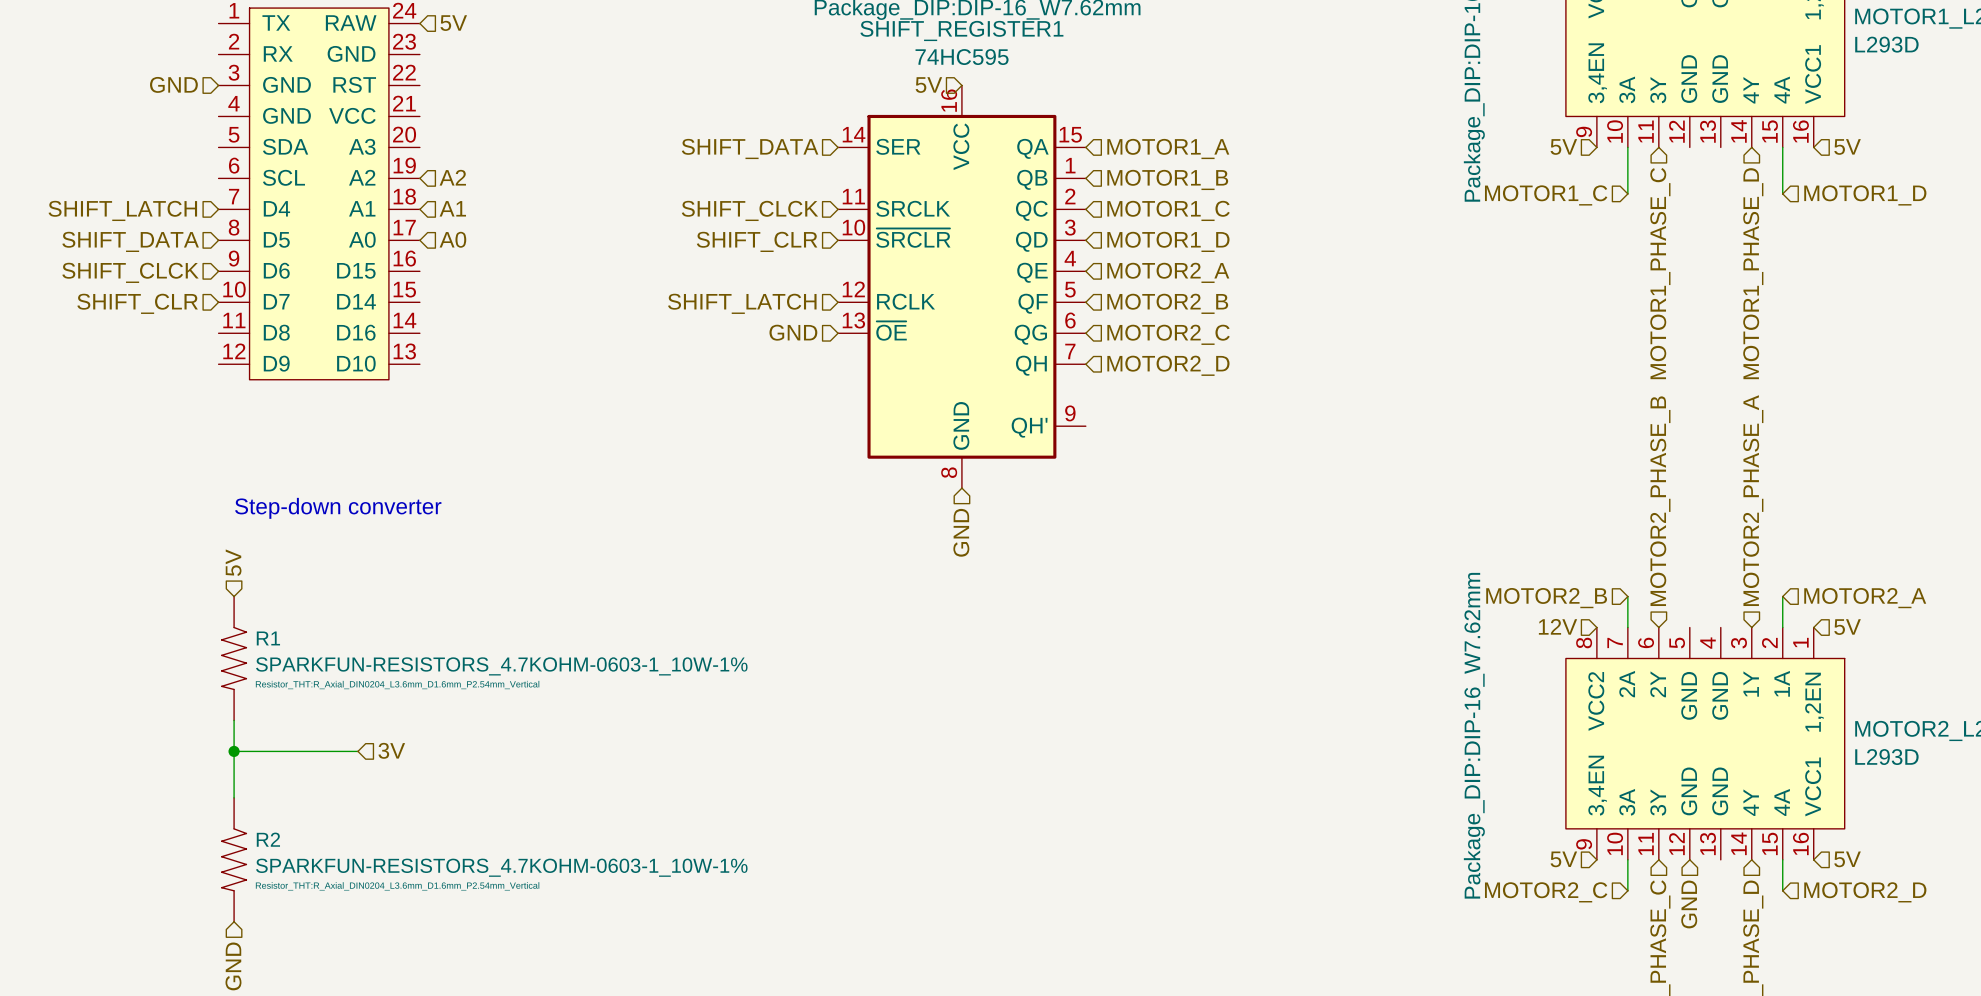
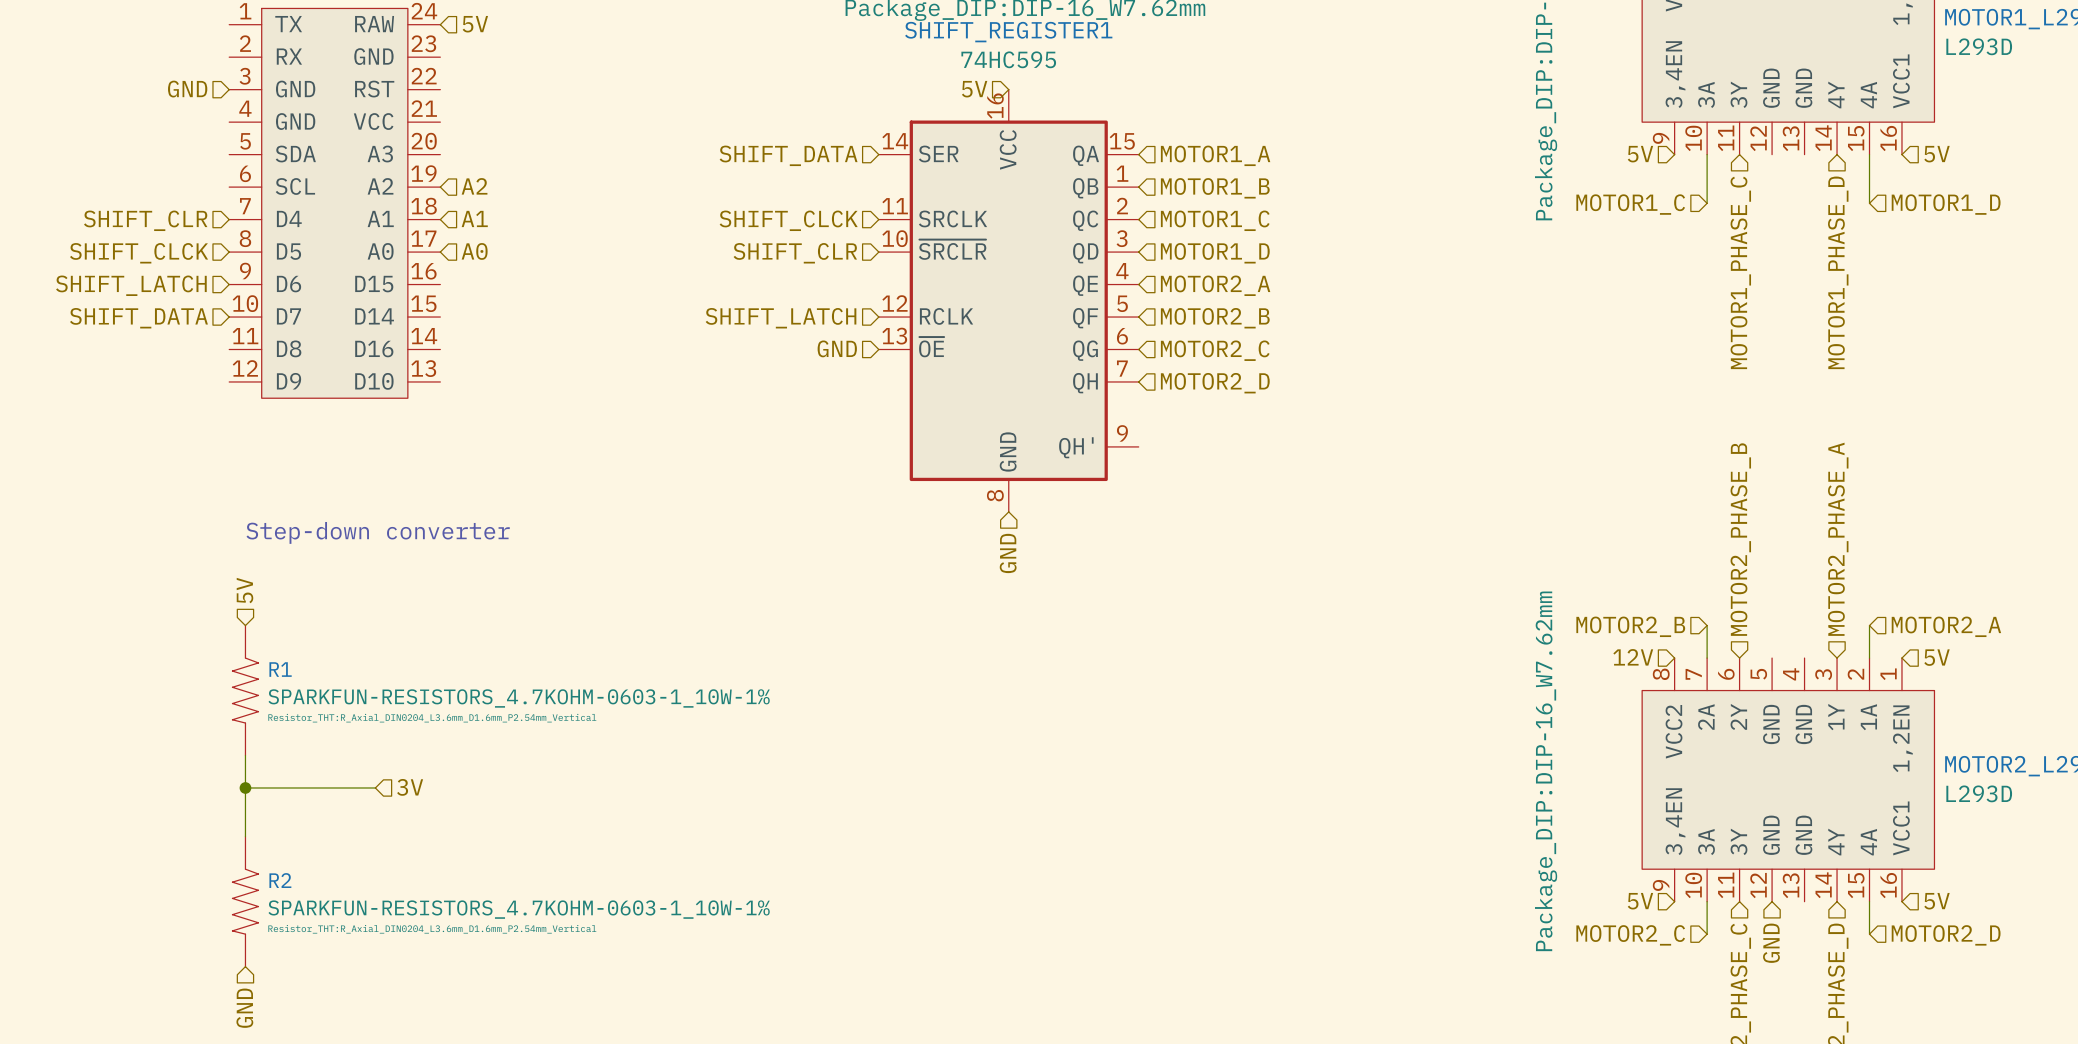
hierarchical label: SHIFT_LATCH (122, 210) -> SHIFT_CLR (145, 220)
hierarchical label: SHIFT_DATA (130, 241) -> SHIFT_CLCK (139, 253)
hierarchical label: SHIFT_CLCK (130, 272) -> SHIFT_LATCH (131, 285)
hierarchical label: SHIFT_CLR (137, 303) -> SHIFT_DATA (138, 318)

